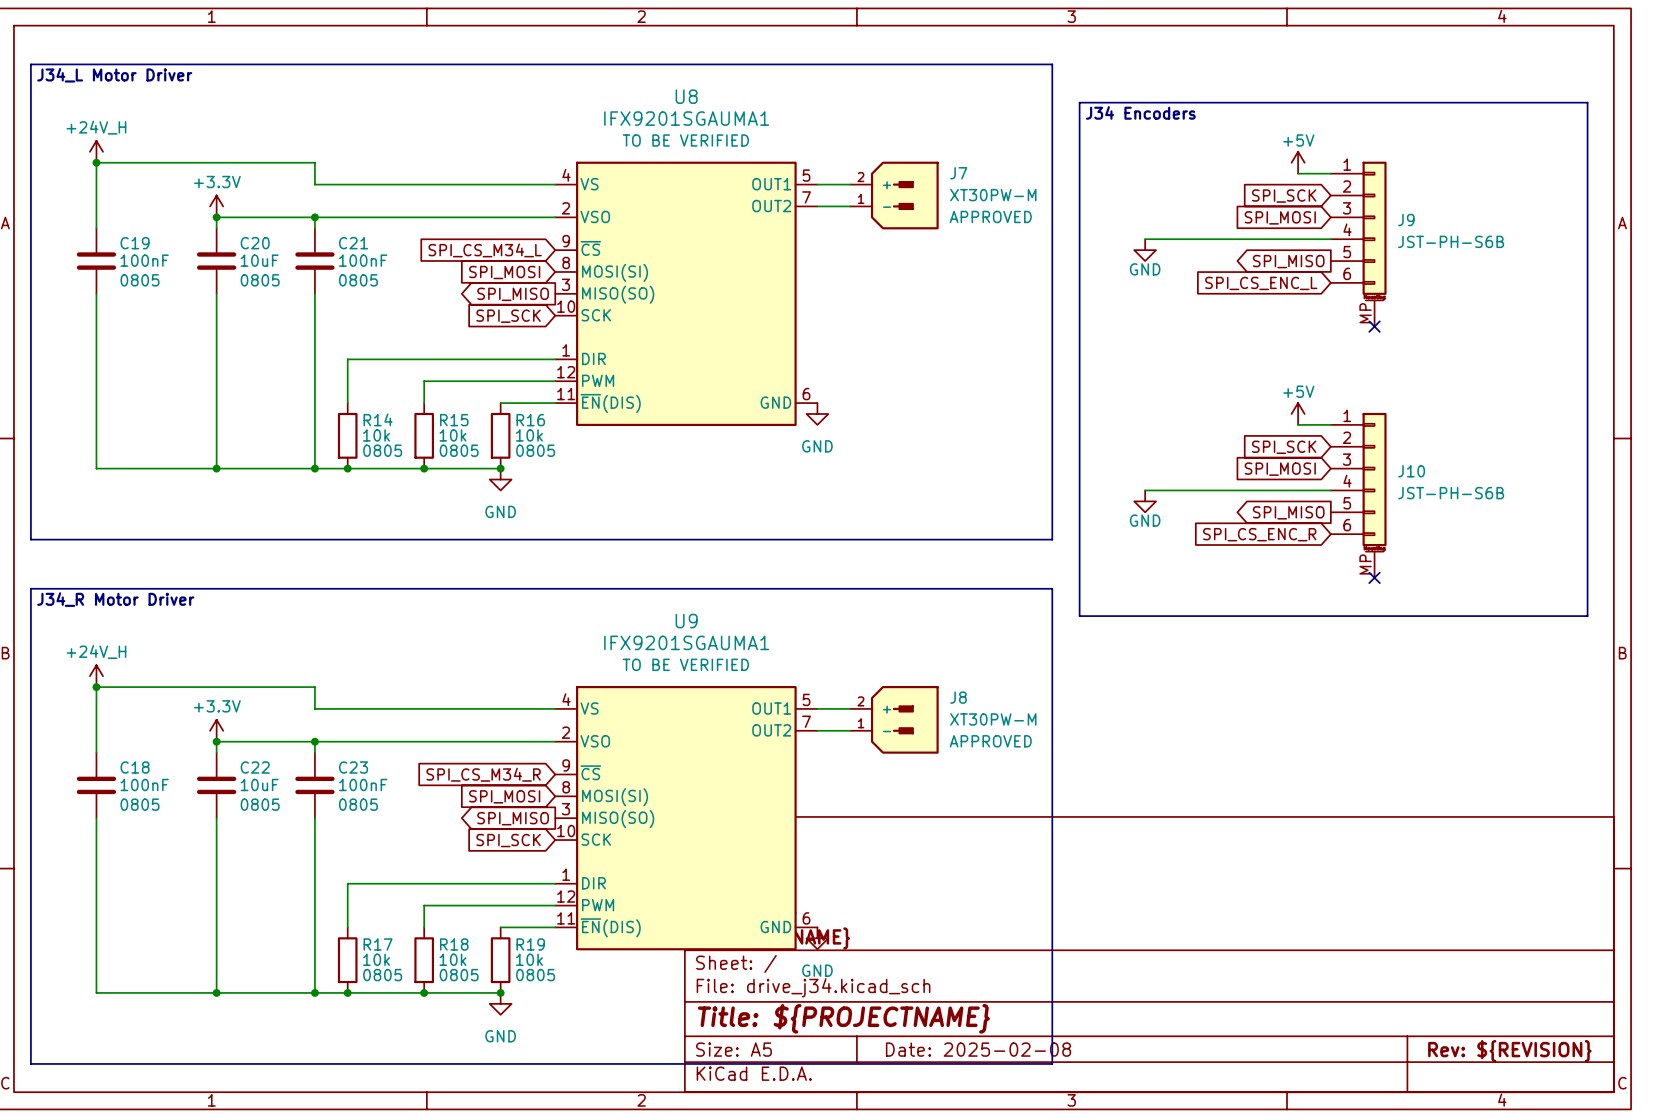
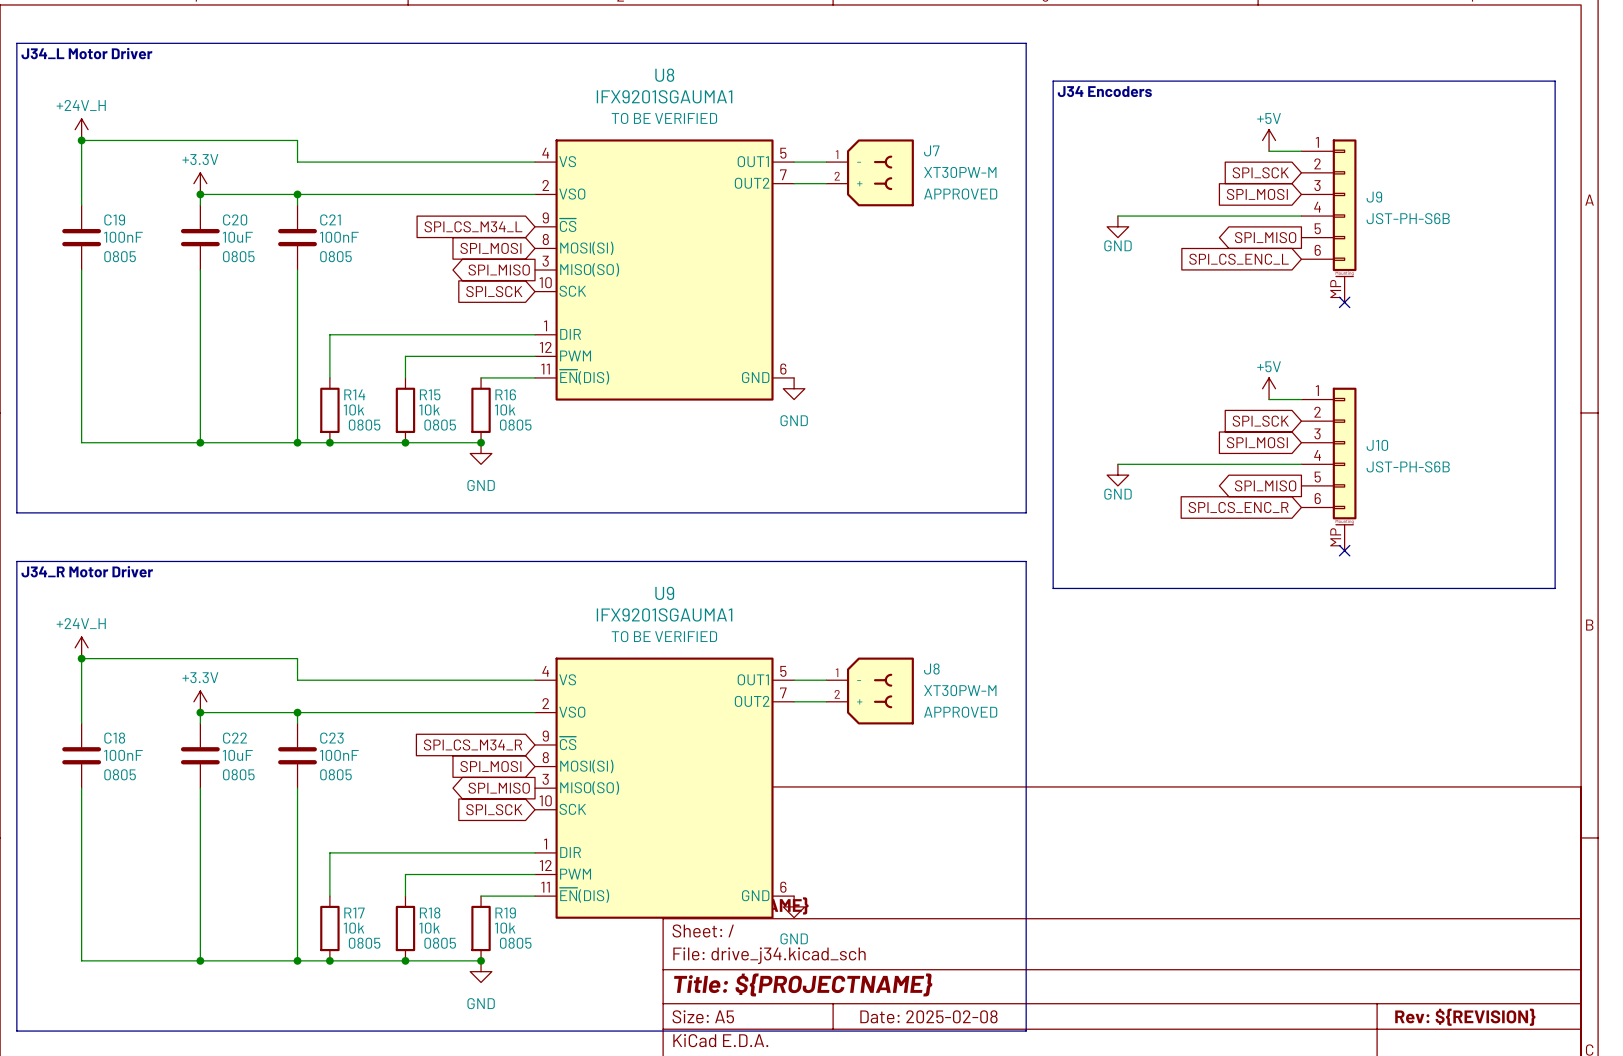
J7 symbol: [850, 161, 939, 230] -> [826, 139, 914, 207]
J8 symbol: [850, 685, 939, 754] -> [826, 657, 914, 725]

